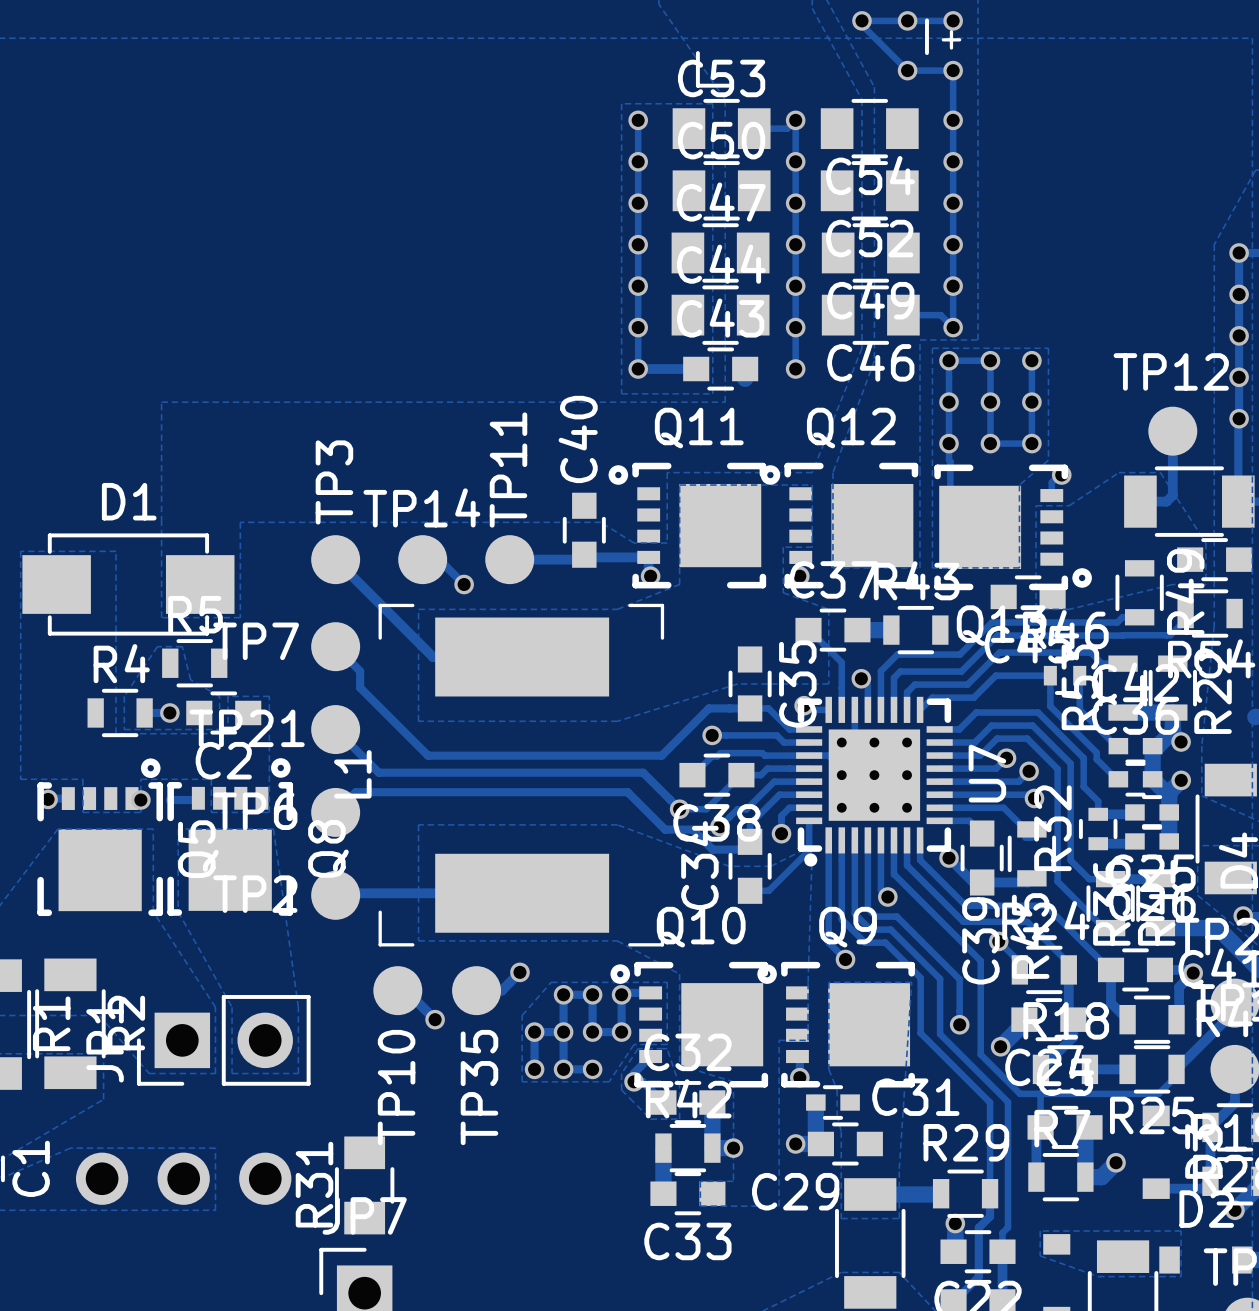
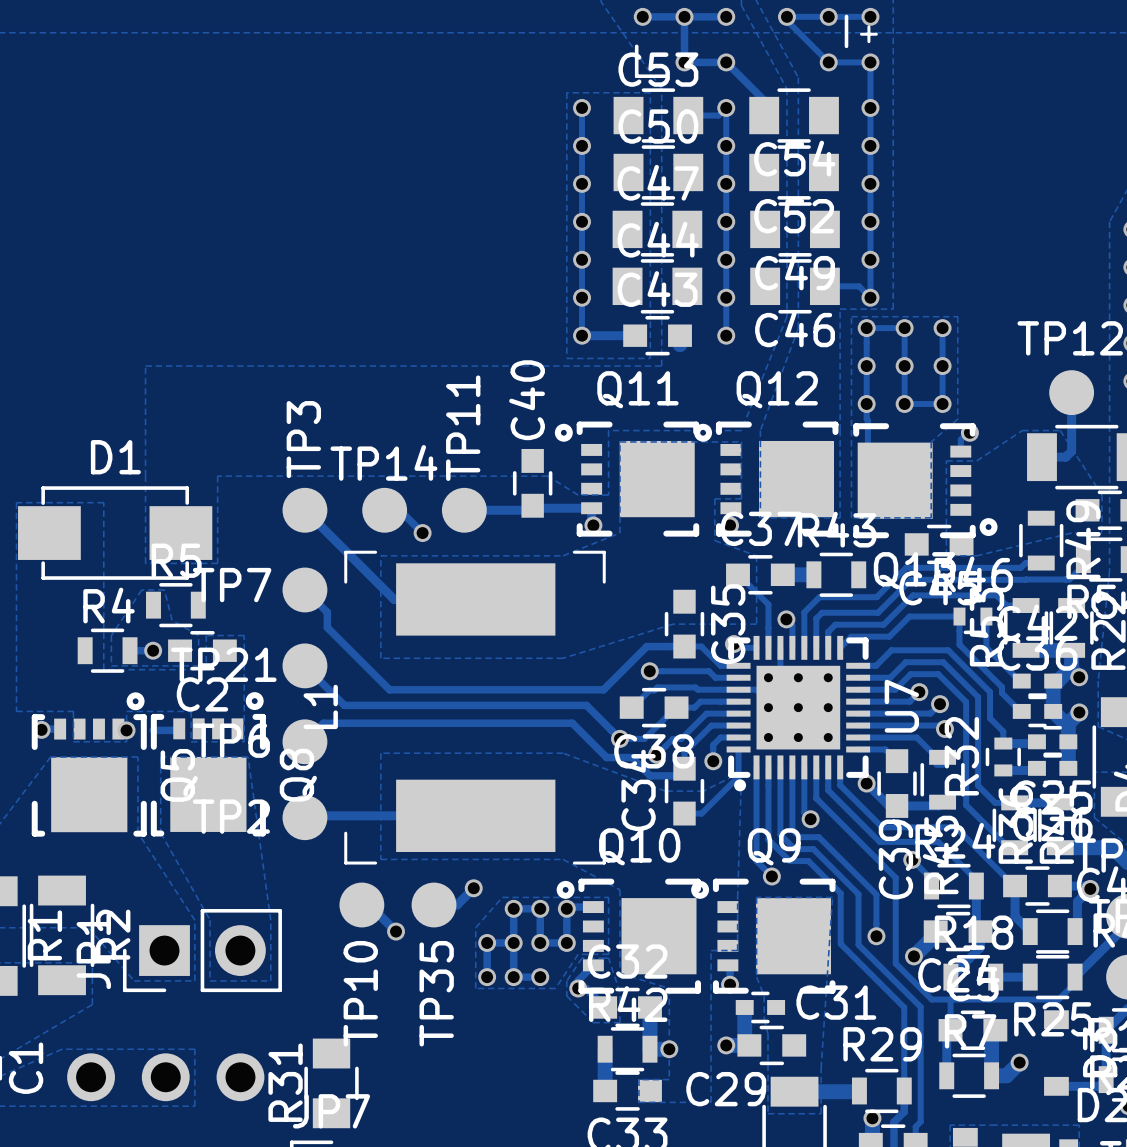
track: none -> (642, 16) (726, 16)
via: none -> (642, 16)
track: none -> (684, 16) (684, 62) (726, 62) (764, 100) (764, 115)
via: none -> (684, 16)
via: none -> (726, 16)
via: none -> (684, 62)
via: none -> (726, 62)

